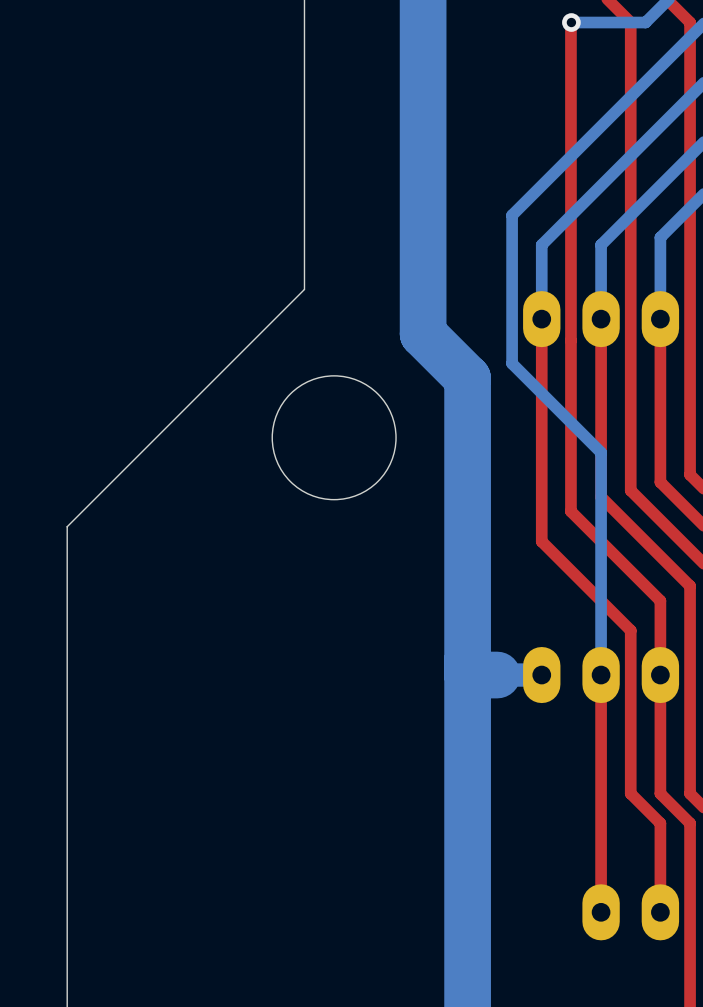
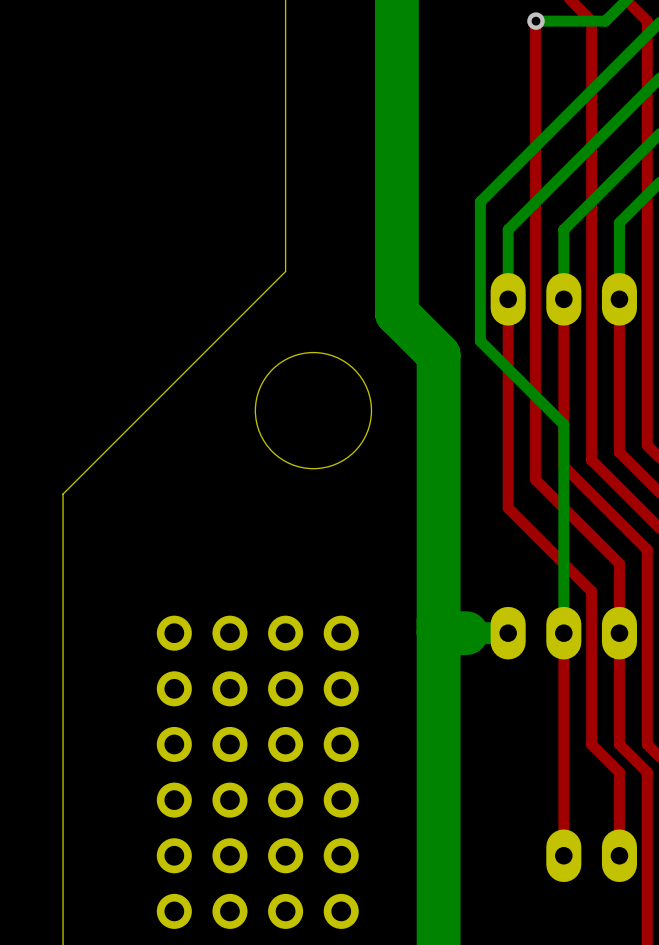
part: none -> (174, 633)
part: none -> (229, 633)
part: none -> (285, 633)
part: none -> (341, 633)
part: none -> (174, 688)
part: none -> (229, 688)
part: none -> (285, 688)
part: none -> (341, 688)
part: none -> (174, 744)
part: none -> (229, 744)
part: none -> (285, 744)
part: none -> (341, 744)
part: none -> (174, 800)
part: none -> (229, 800)
part: none -> (285, 800)
part: none -> (341, 800)
part: none -> (174, 855)
part: none -> (229, 855)
part: none -> (285, 855)
part: none -> (341, 855)
part: none -> (174, 911)
part: none -> (229, 911)
part: none -> (285, 911)
part: none -> (341, 911)

